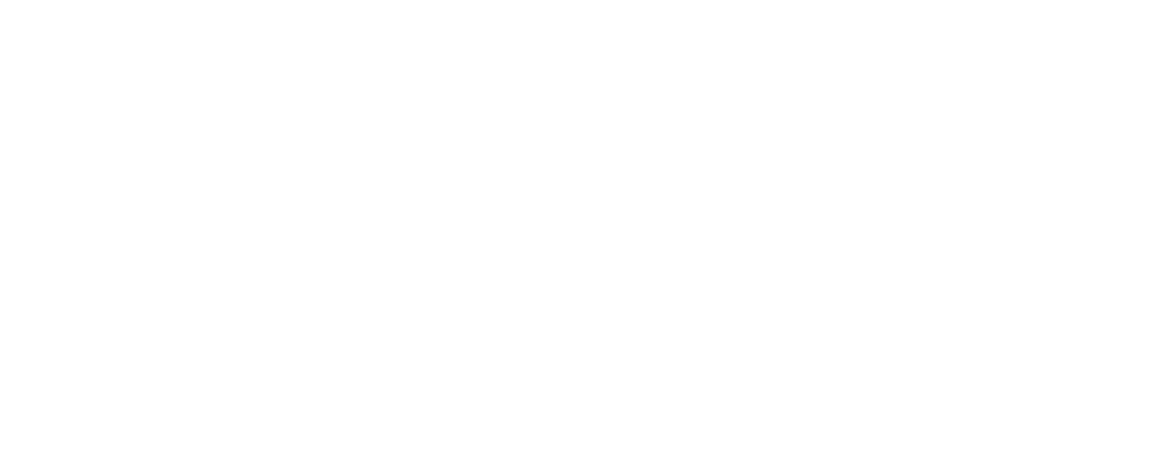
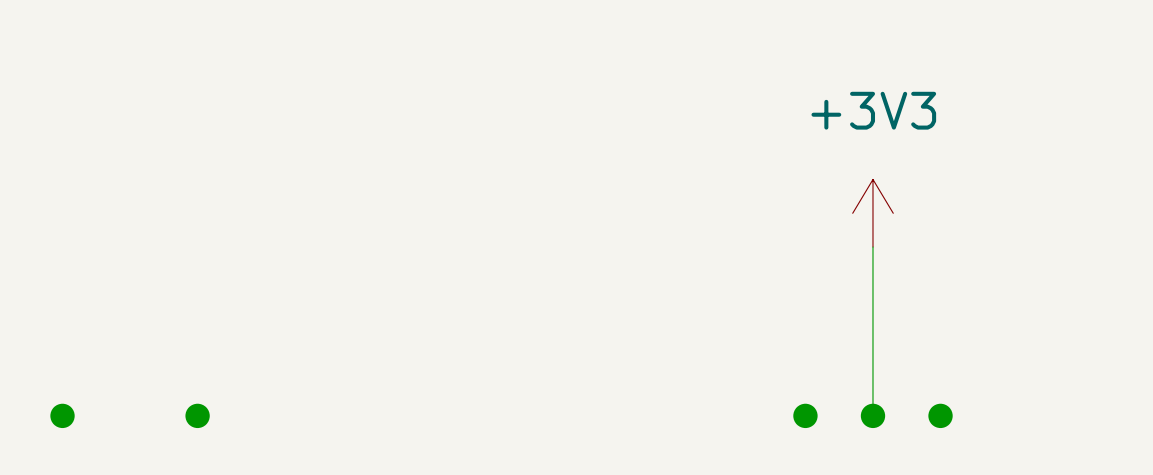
power symbol: none -> +3V3 (872, 213)
wire: none -> (872, 247) (872, 415)
junction: none -> (62, 415)
junction: none -> (197, 415)
junction: none -> (805, 415)
junction: none -> (872, 415)
junction: none -> (940, 415)

